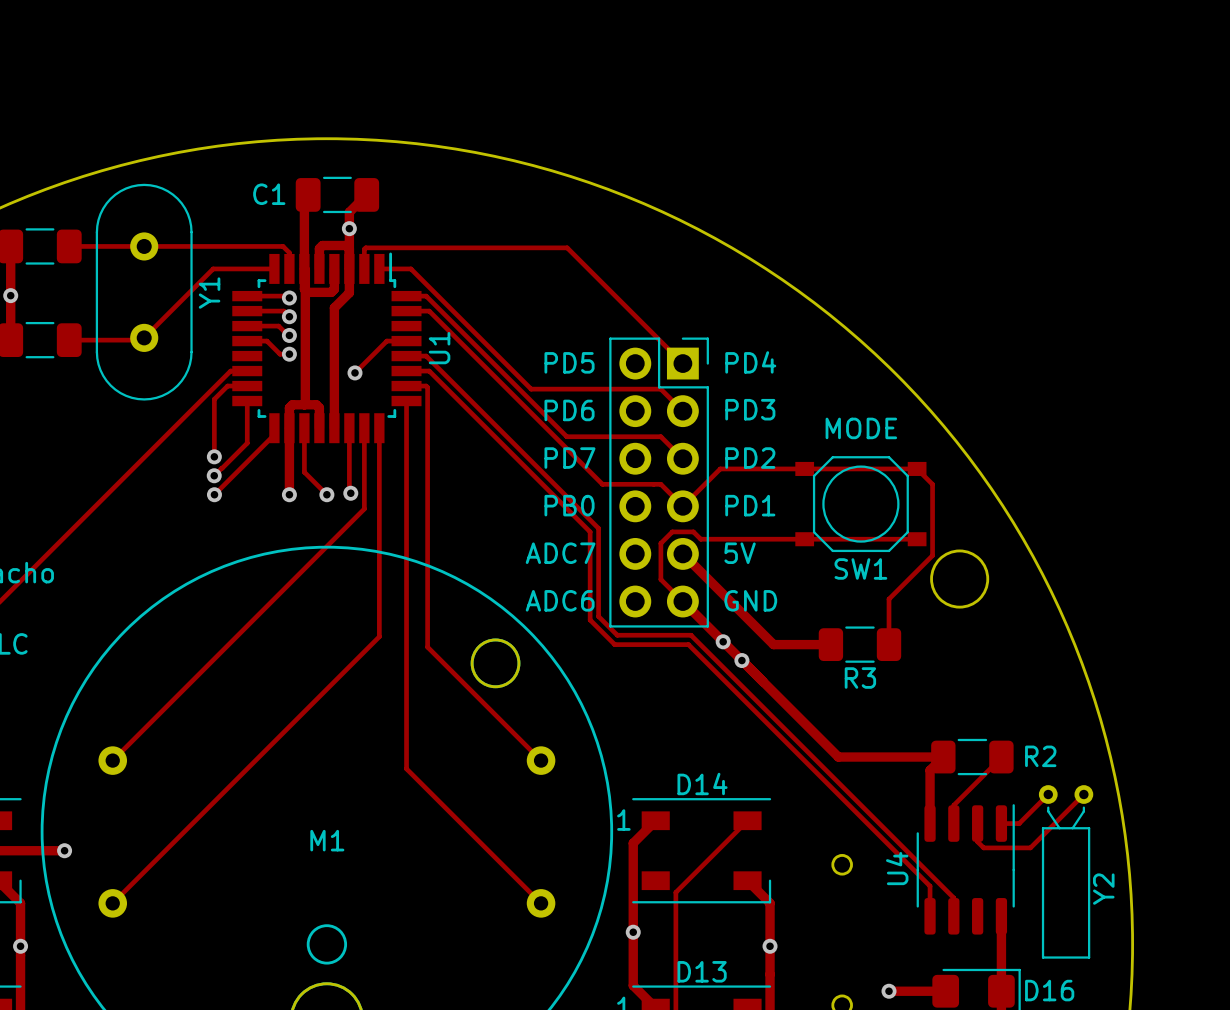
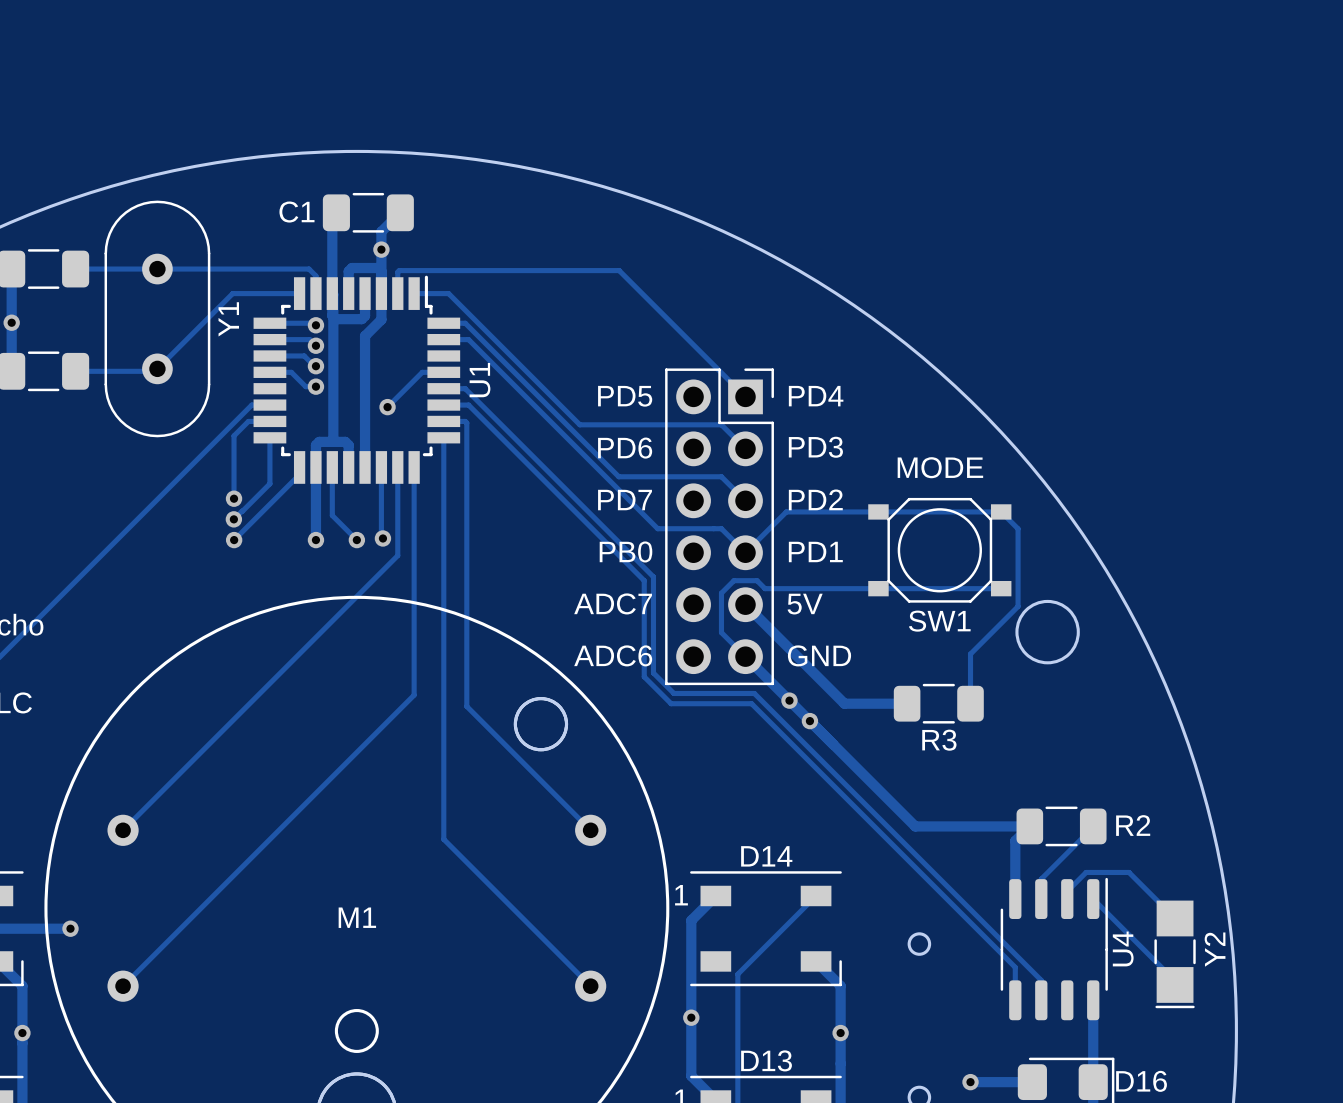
Y2 footprint: [1038, 785, 1094, 959] -> [1154, 900, 1196, 1009]
track: (1048, 794) (1019, 823) (1001, 823) -> (1175, 984) (1175, 980) (1093, 899)
track: (1083, 794) (1030, 847) (983, 847) (977, 841) (977, 823) -> (1175, 918) (1129, 872) (1086, 872) (1067, 891) (1067, 899)
U4 name position: U4 (897, 868) -> U4 (1123, 948)

